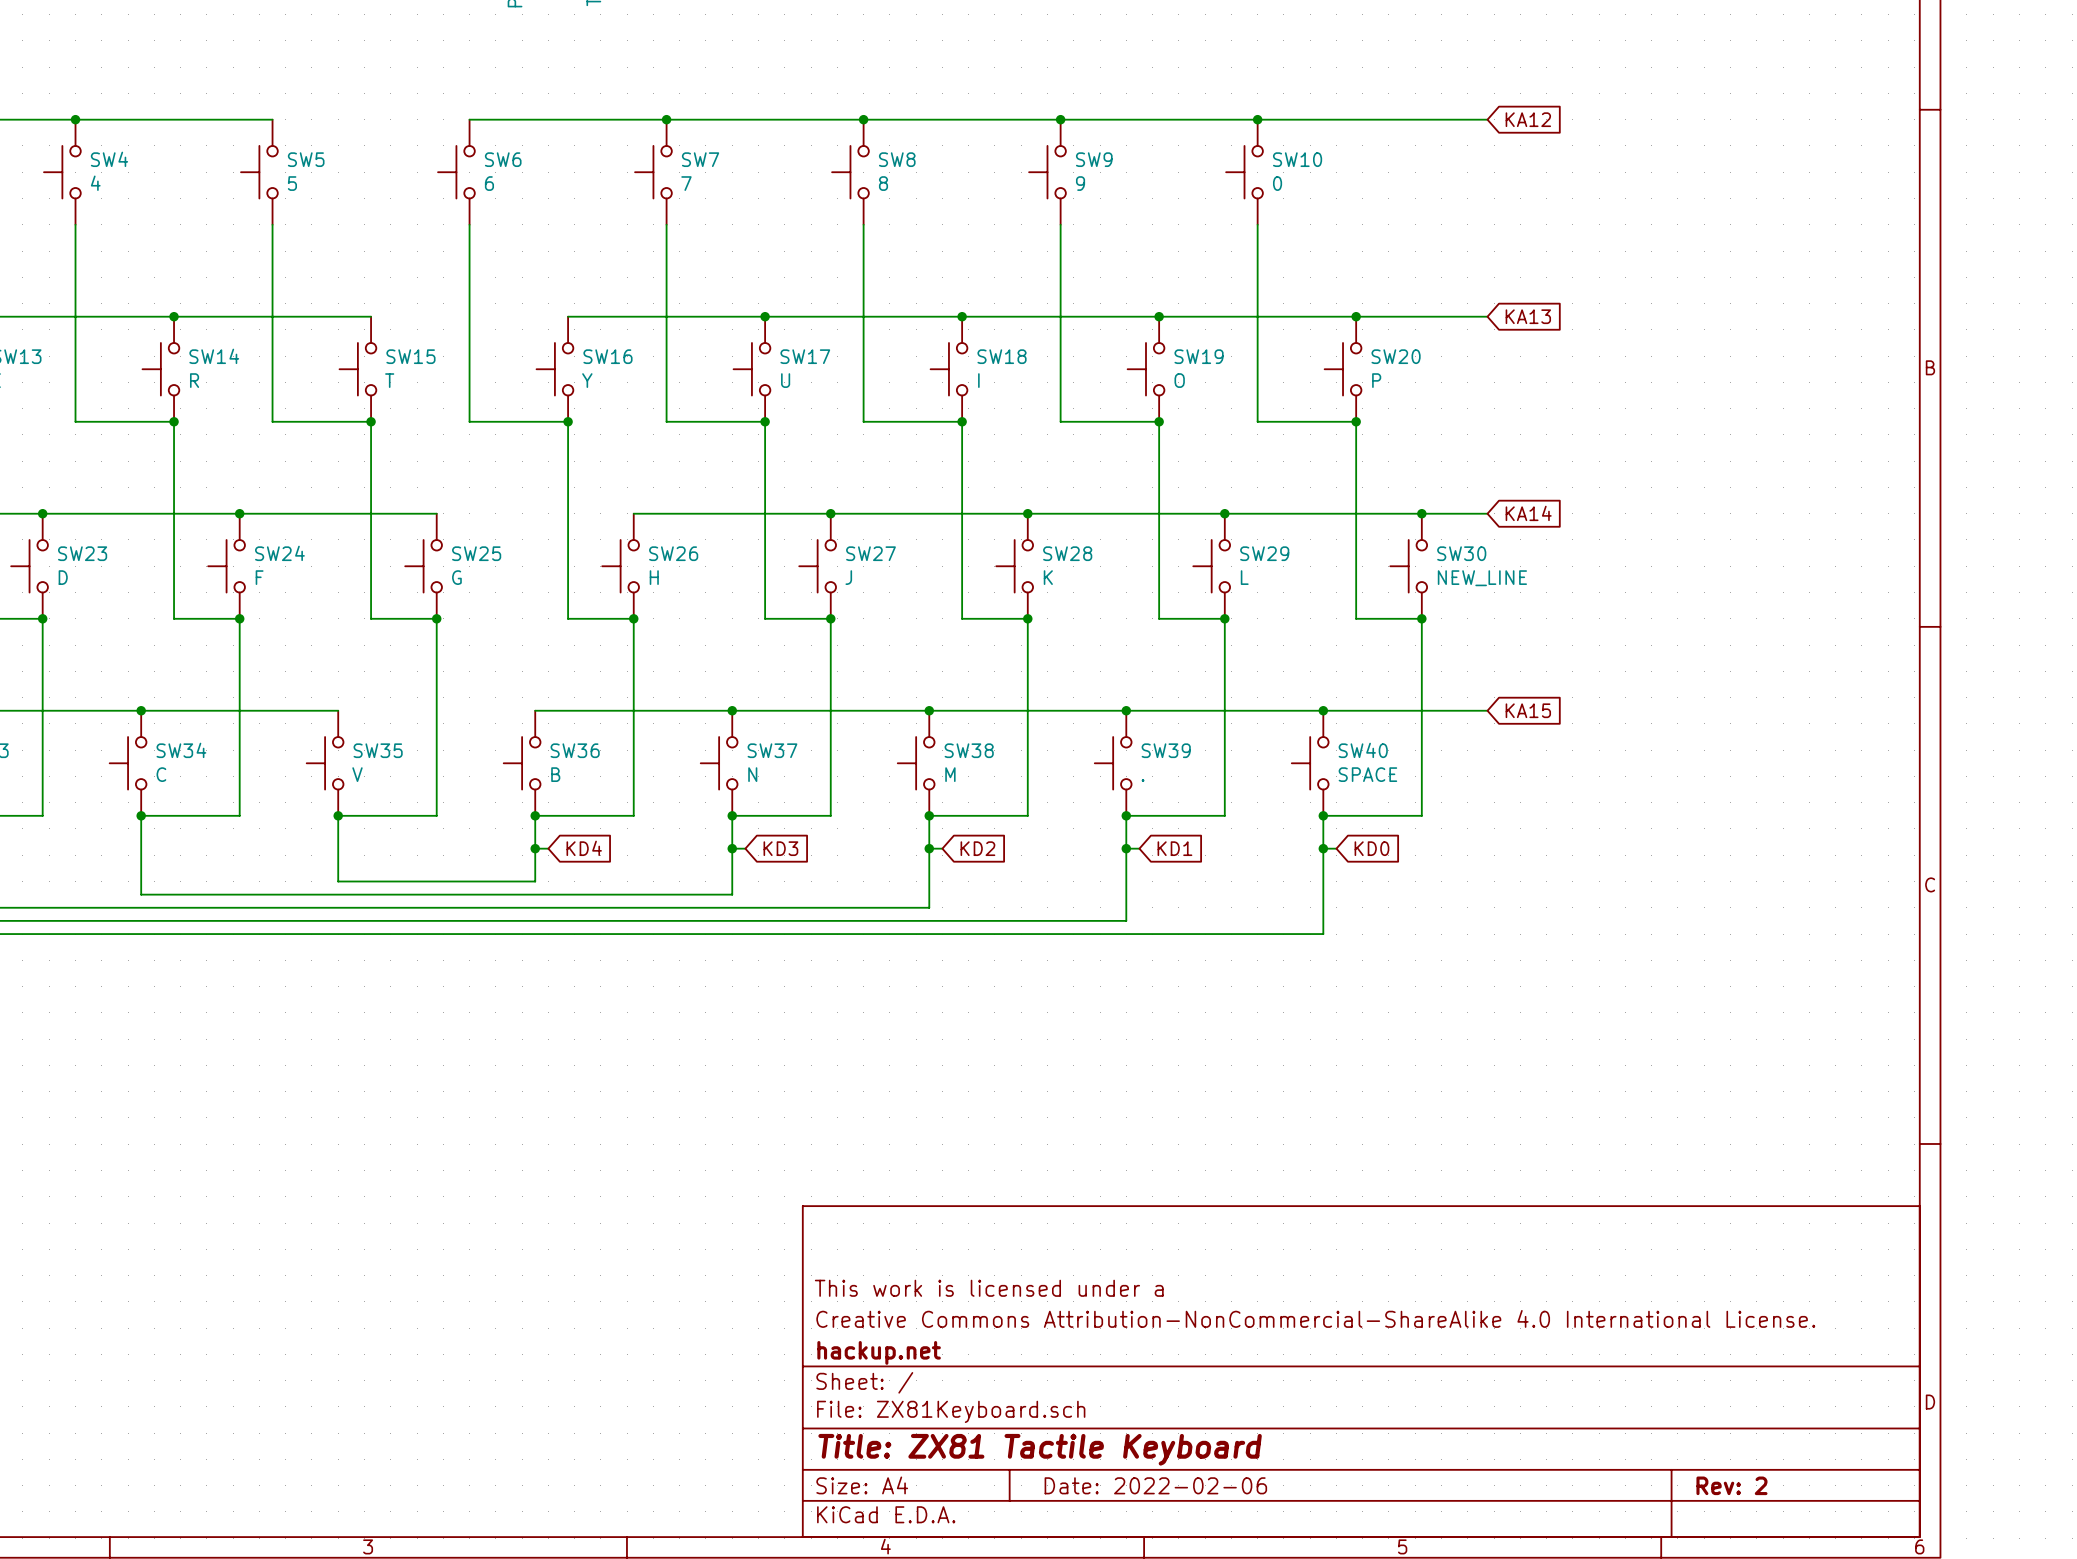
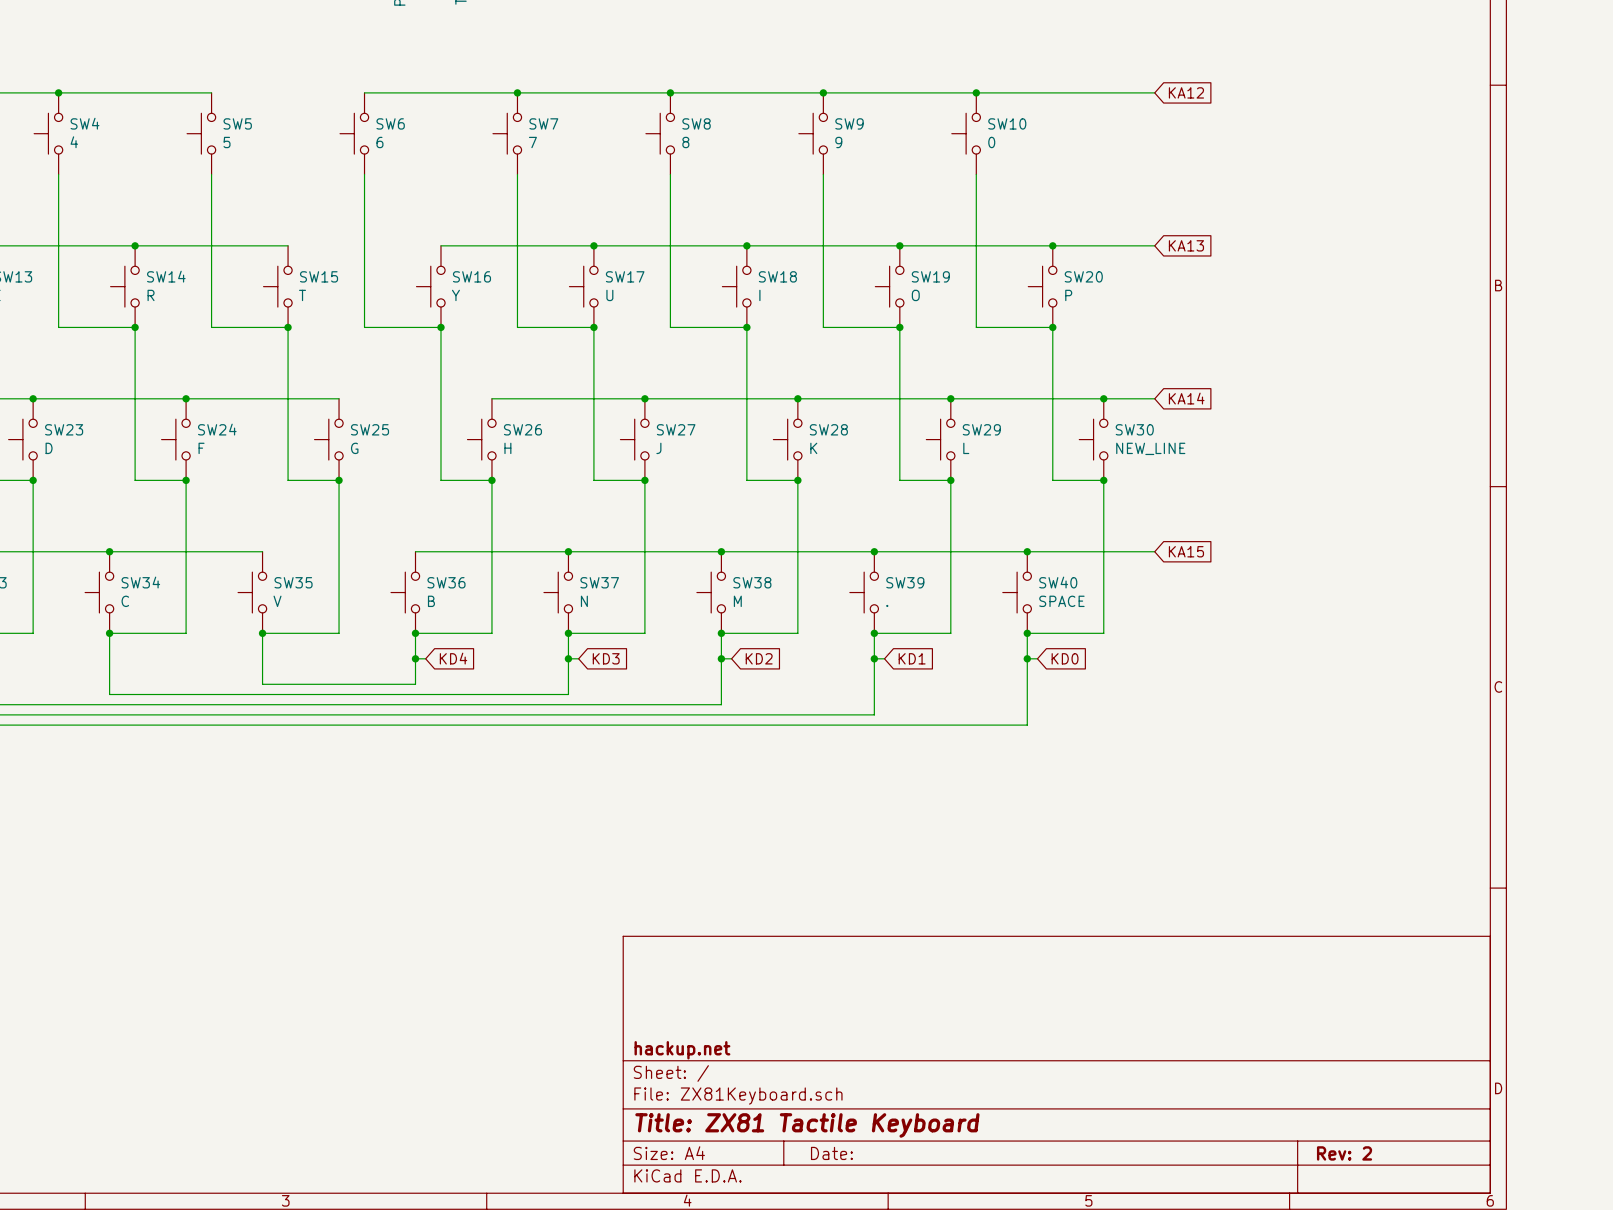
title block: This work is licensed under a (989, 1288) -> none
title block: Creative Commons Attribution-NonCommercial-ShareAlike 4.0 International License. (1315, 1318) -> none
title block: Date: 2022-02-06 (1155, 1485) -> Date: (831, 1153)

